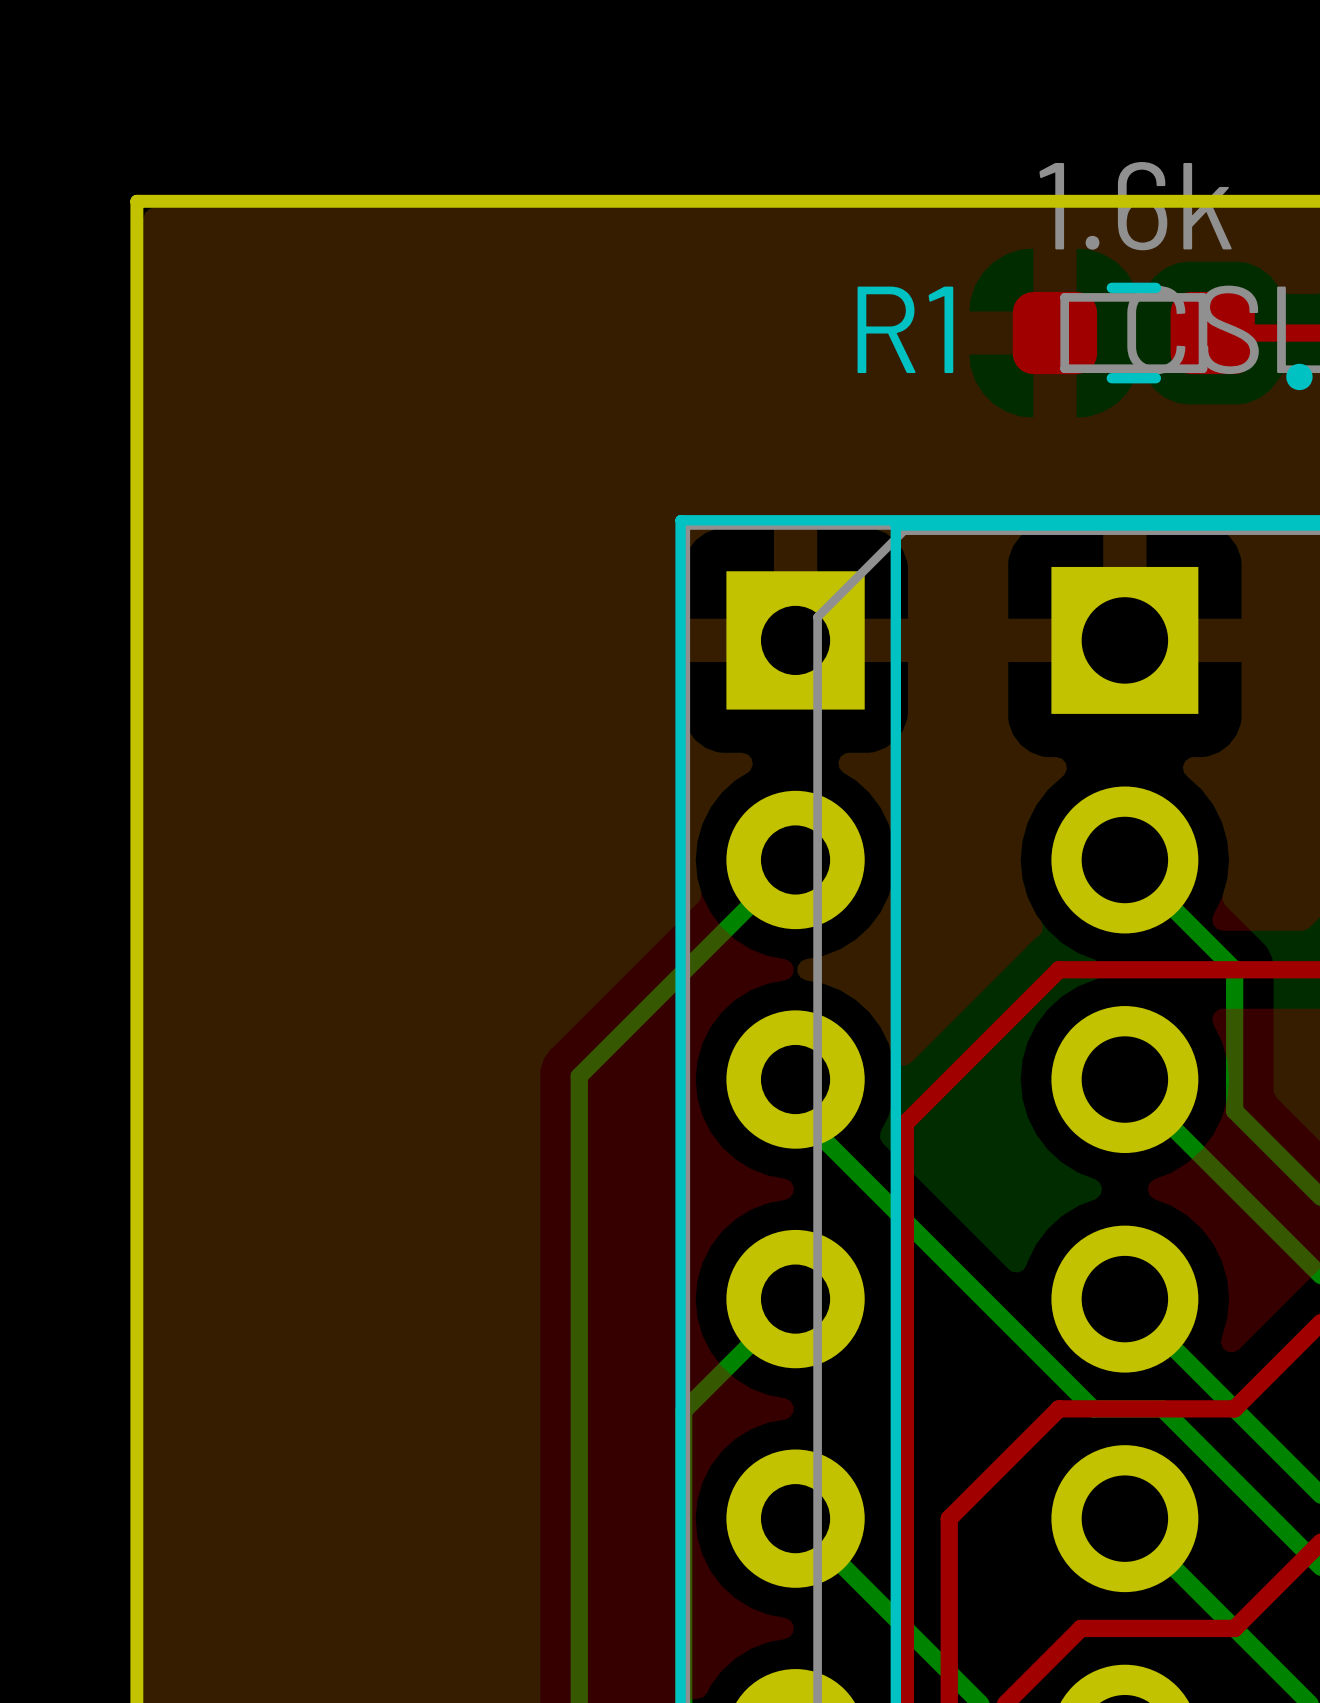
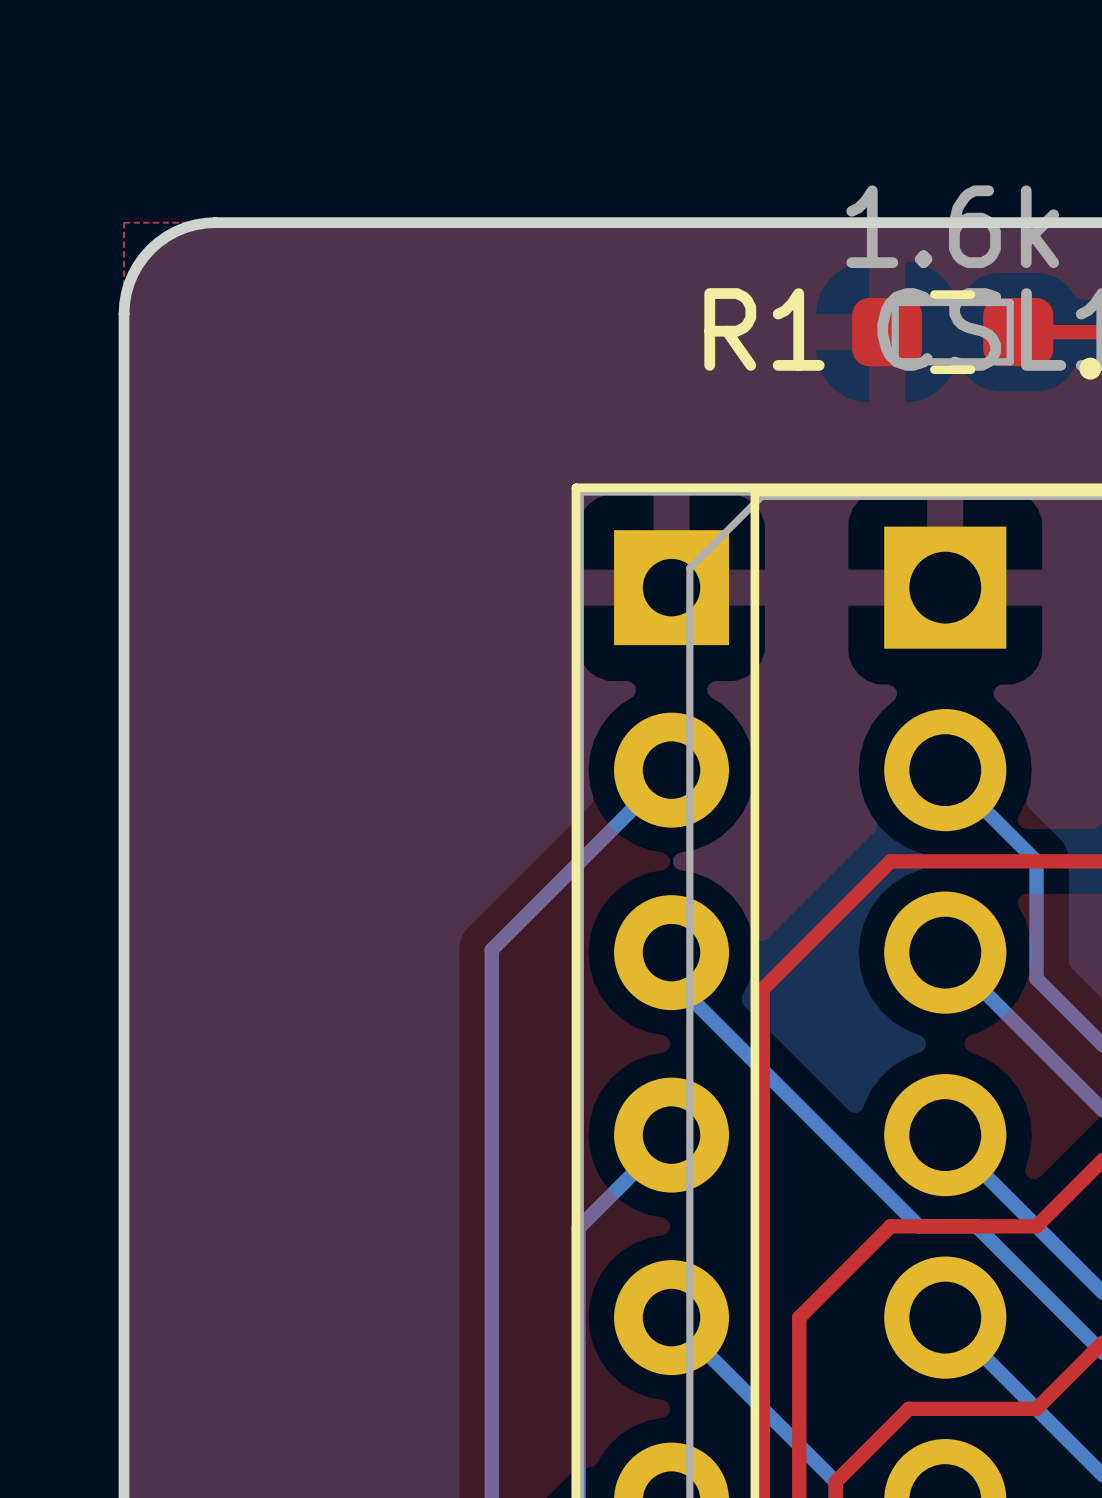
board edge: (246, 201) (136, 201) (136, 311) -> (215, 222) (185, 227) (166, 236) (150, 249) (133, 274) (126, 293) (124, 313)

